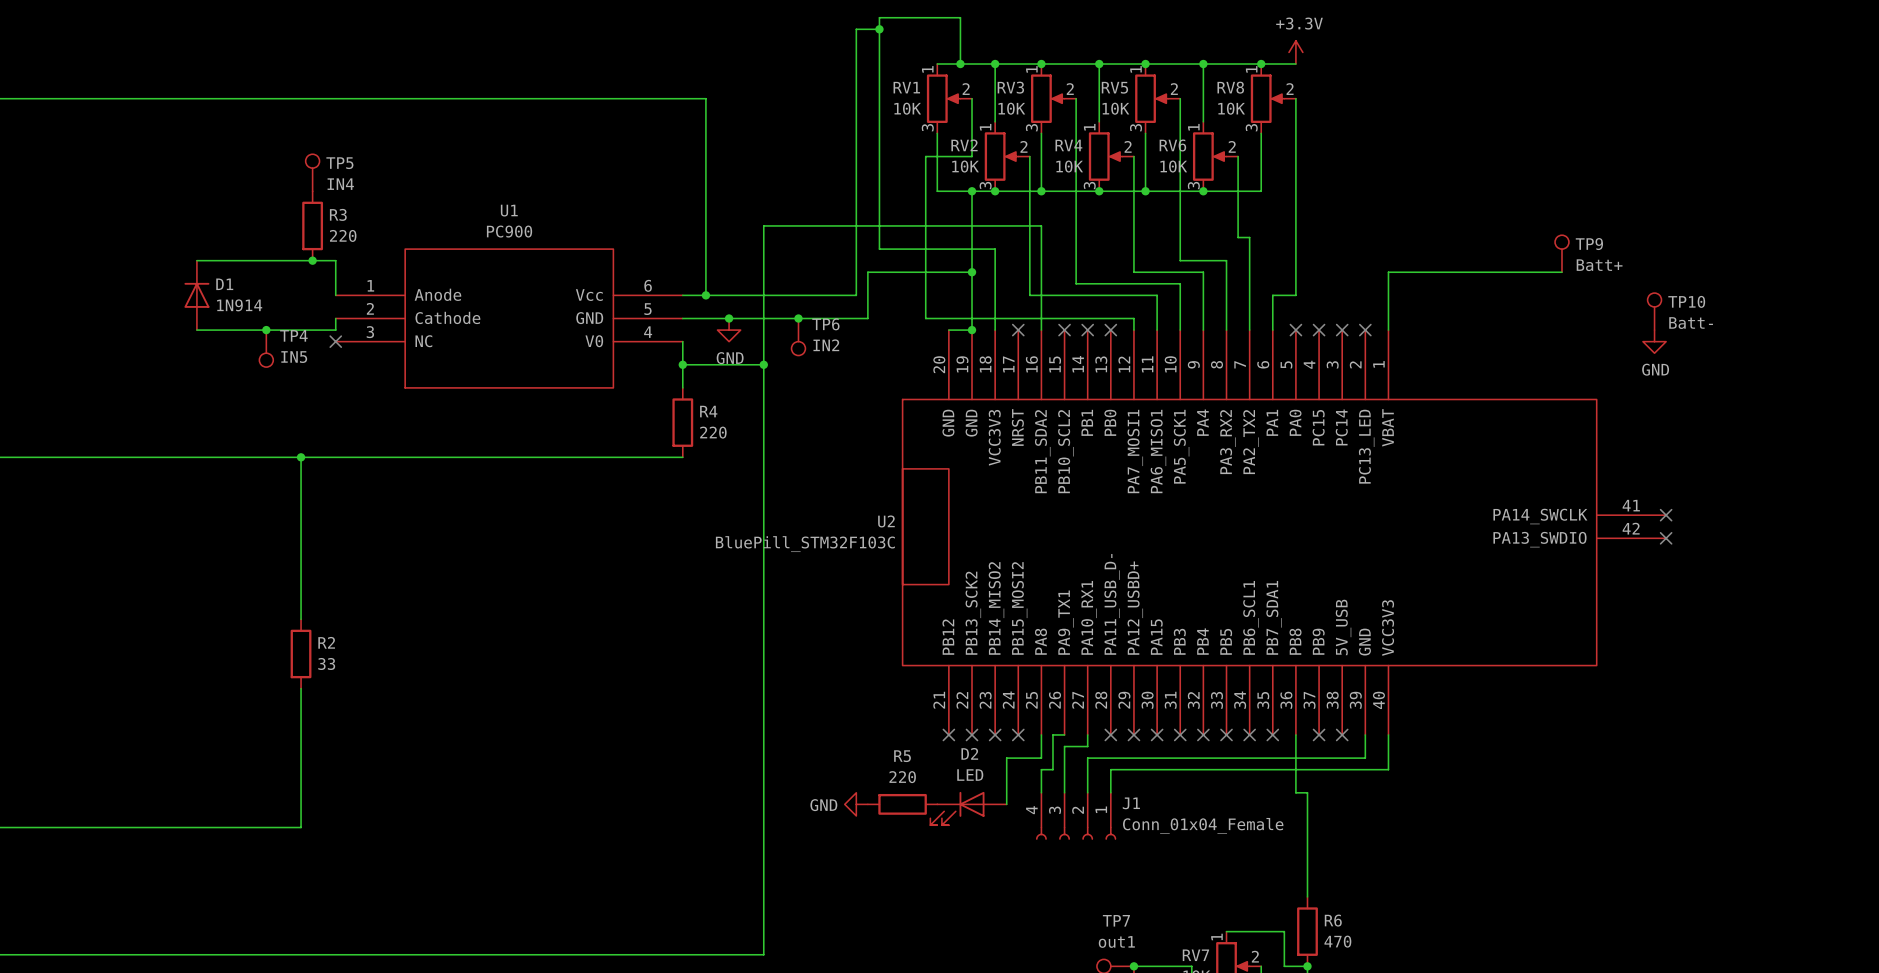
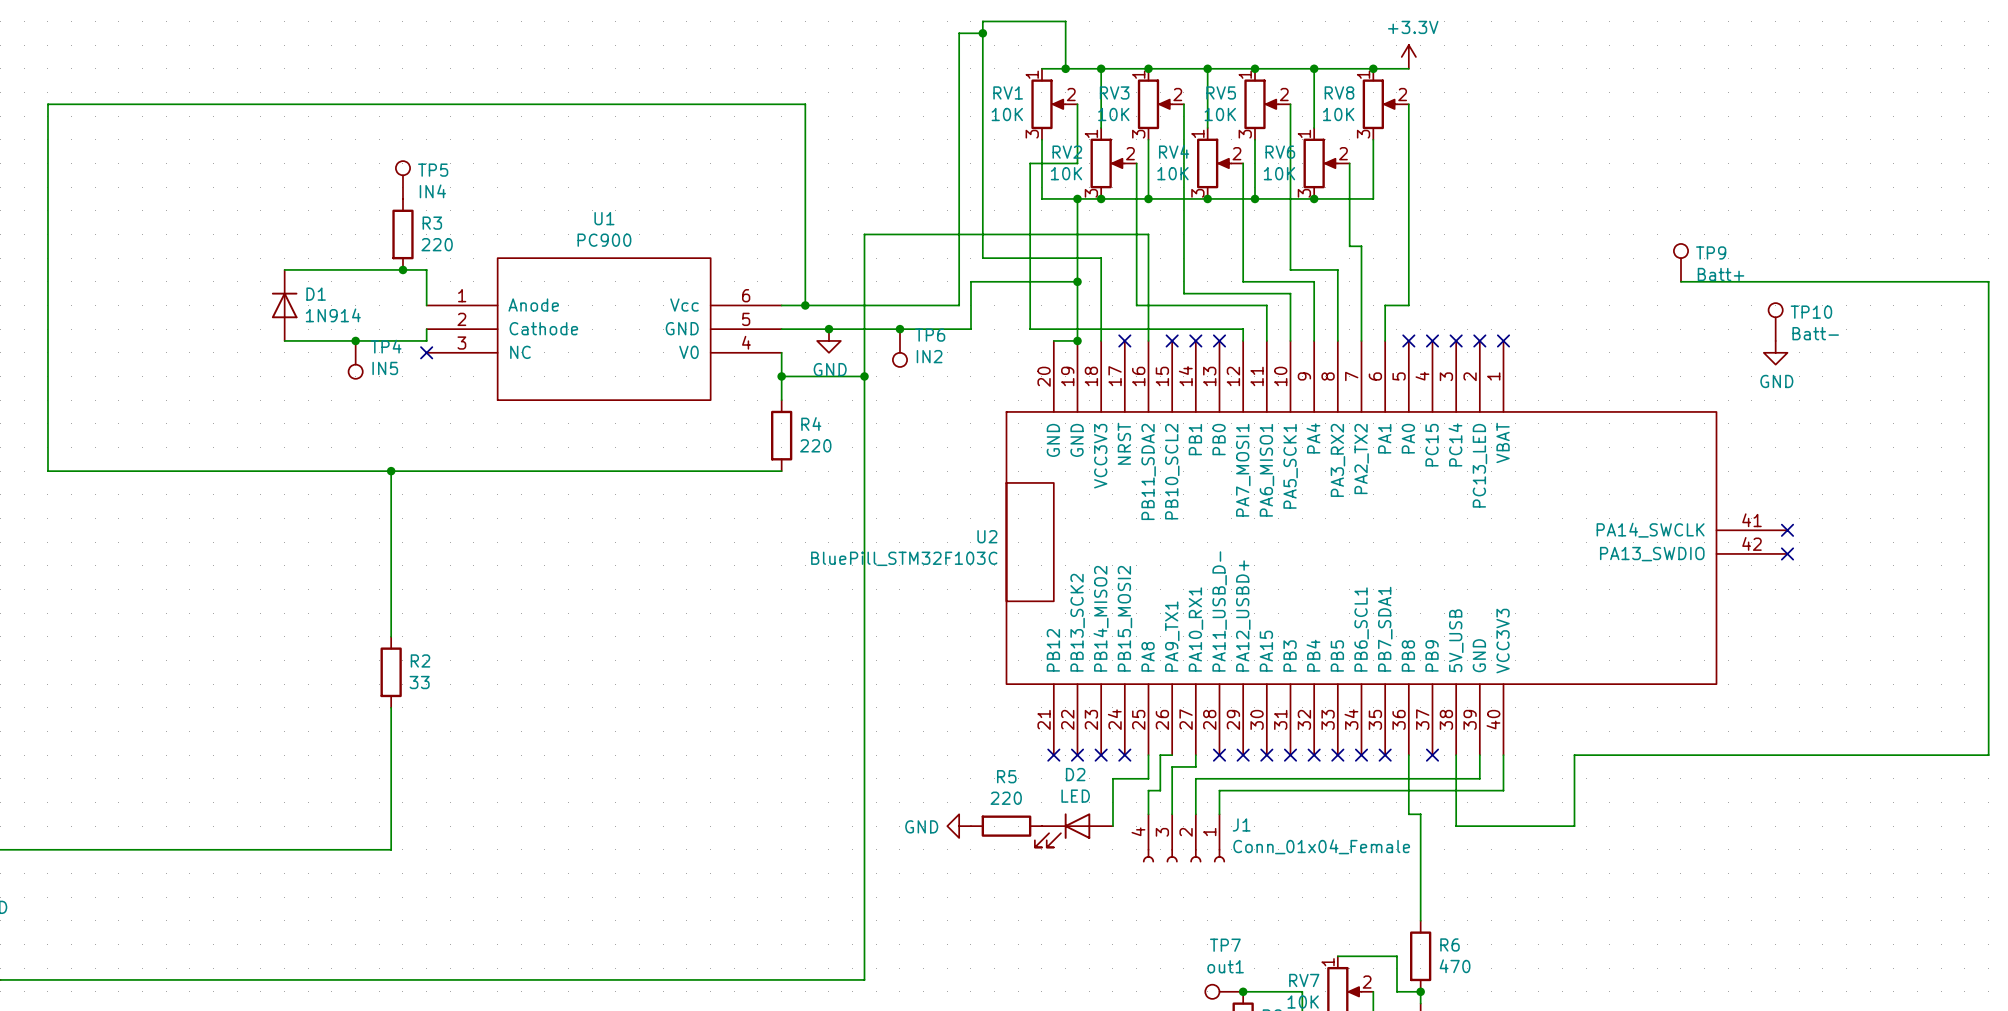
wire: (1561, 272) (1388, 272) (1388, 330) -> (1680, 281) (1988, 281) (1988, 755) (1574, 755) (1574, 826) (1456, 826) (1456, 755)
no-connect mark: none -> (1503, 340)
no-connect mark: (1342, 734) -> none

